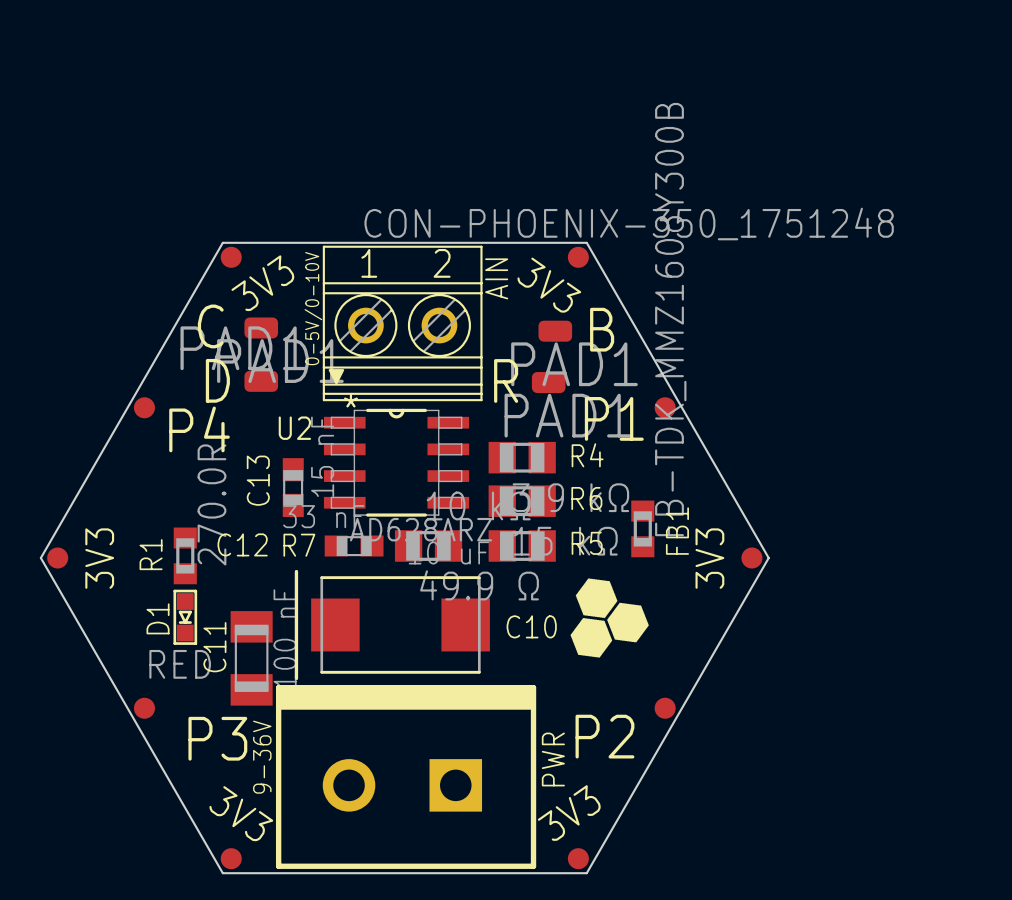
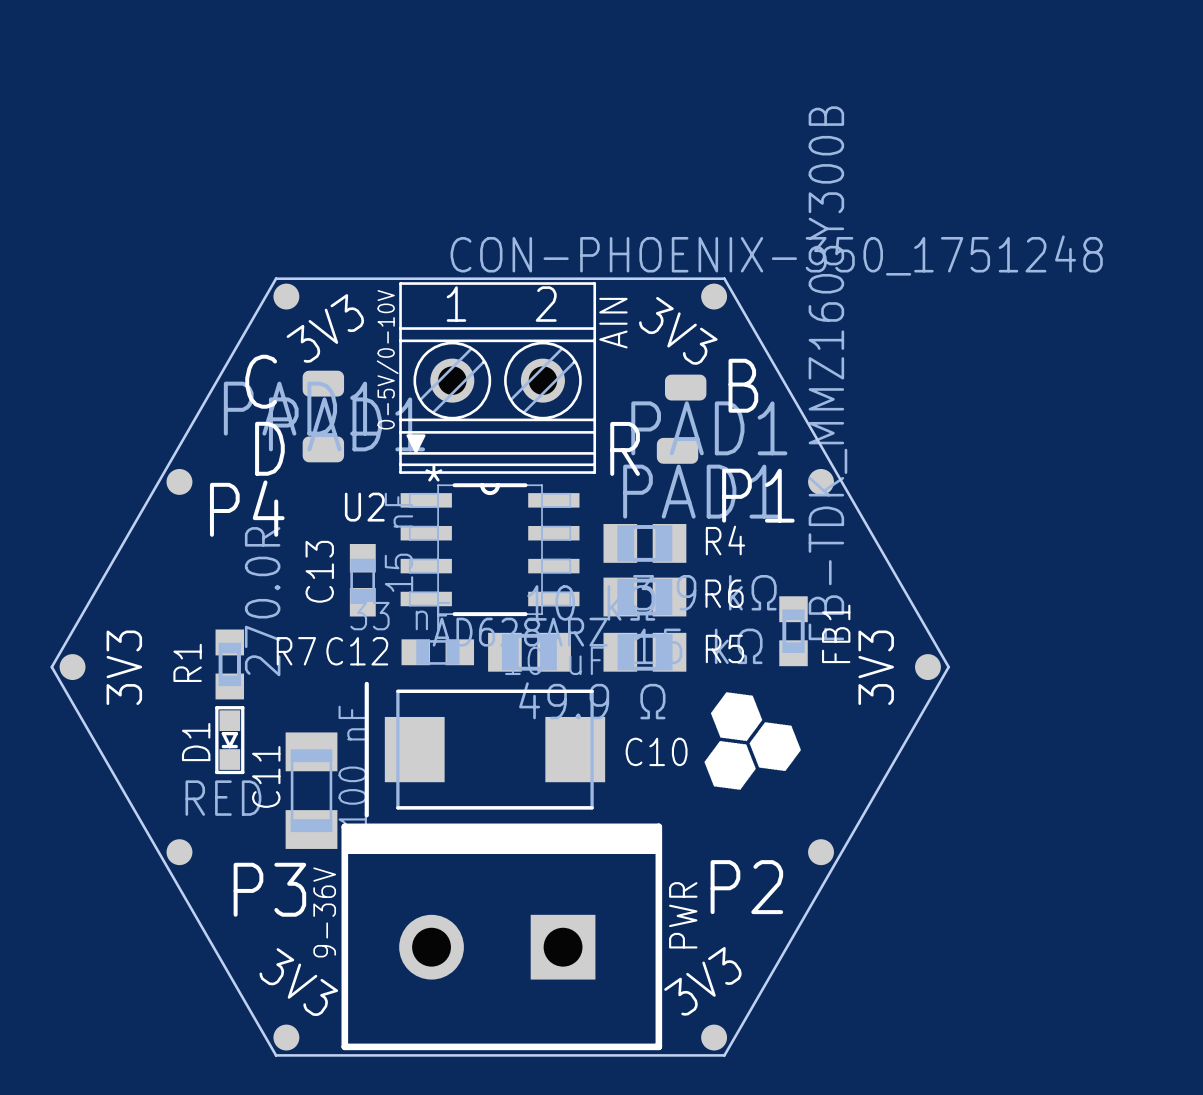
C12 name position: C12 (242, 544) -> C12 (357, 651)
R7 name position: R7 (299, 545) -> R7 (296, 651)

